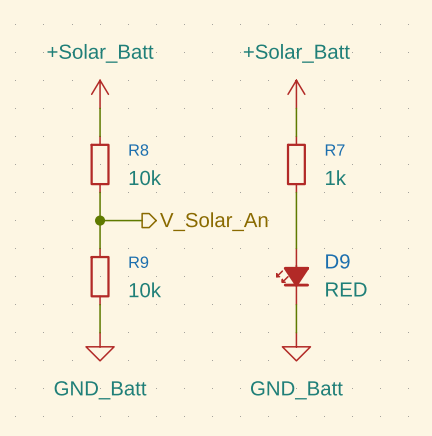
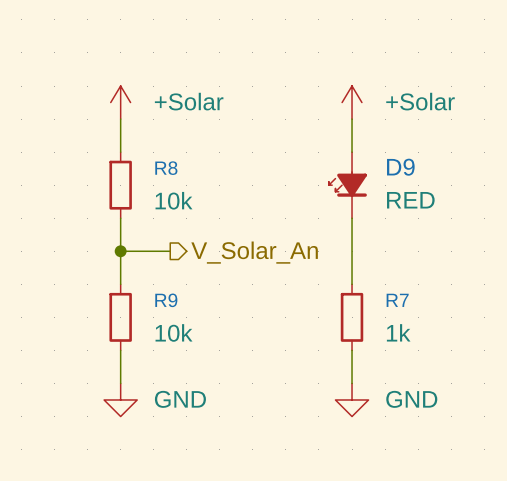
power symbol: +Solar_Batt (100, 94) -> +Solar (120, 102)
power symbol: +Solar_Batt (296, 94) -> +Solar (352, 102)
R7 position: (296, 164) -> (352, 317)
D9 position: (292, 276) -> (347, 185)
power symbol: GND_Batt (100, 346) -> GND (120, 399)
power symbol: GND_Batt (296, 346) -> GND (352, 399)

